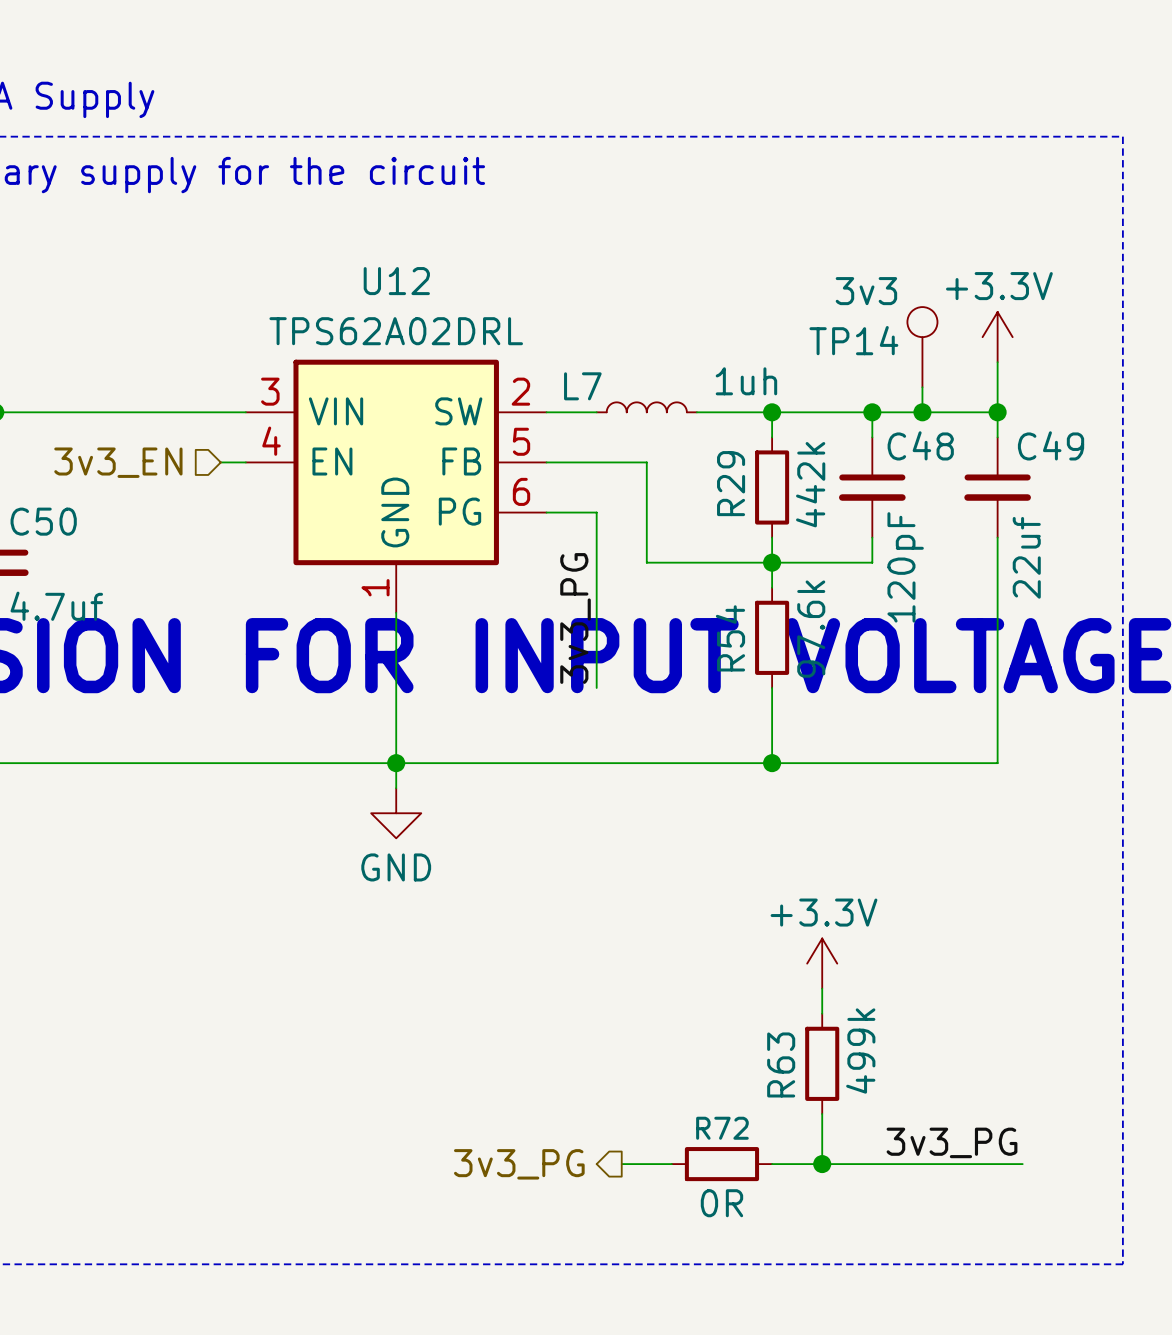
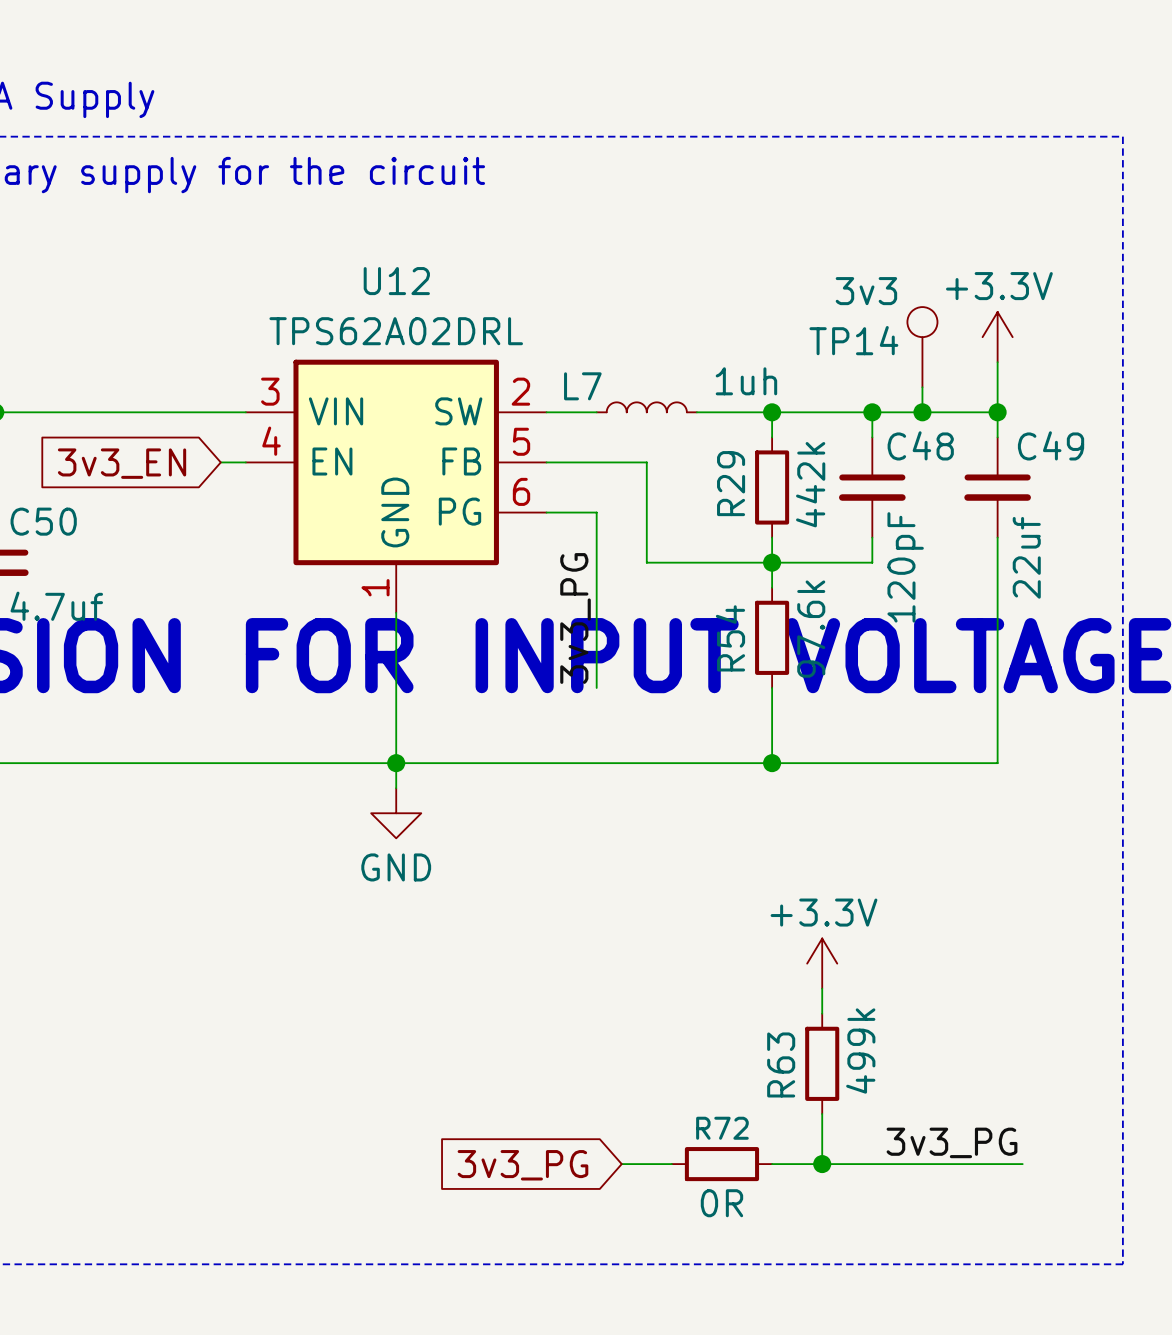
hierarchical label: 3v3_EN (118, 462) -> none
global label: none -> 3v3_EN (122, 463)
hierarchical label: 3v3_PG (519, 1164) -> none
global label: none -> 3v3_PG (522, 1165)

